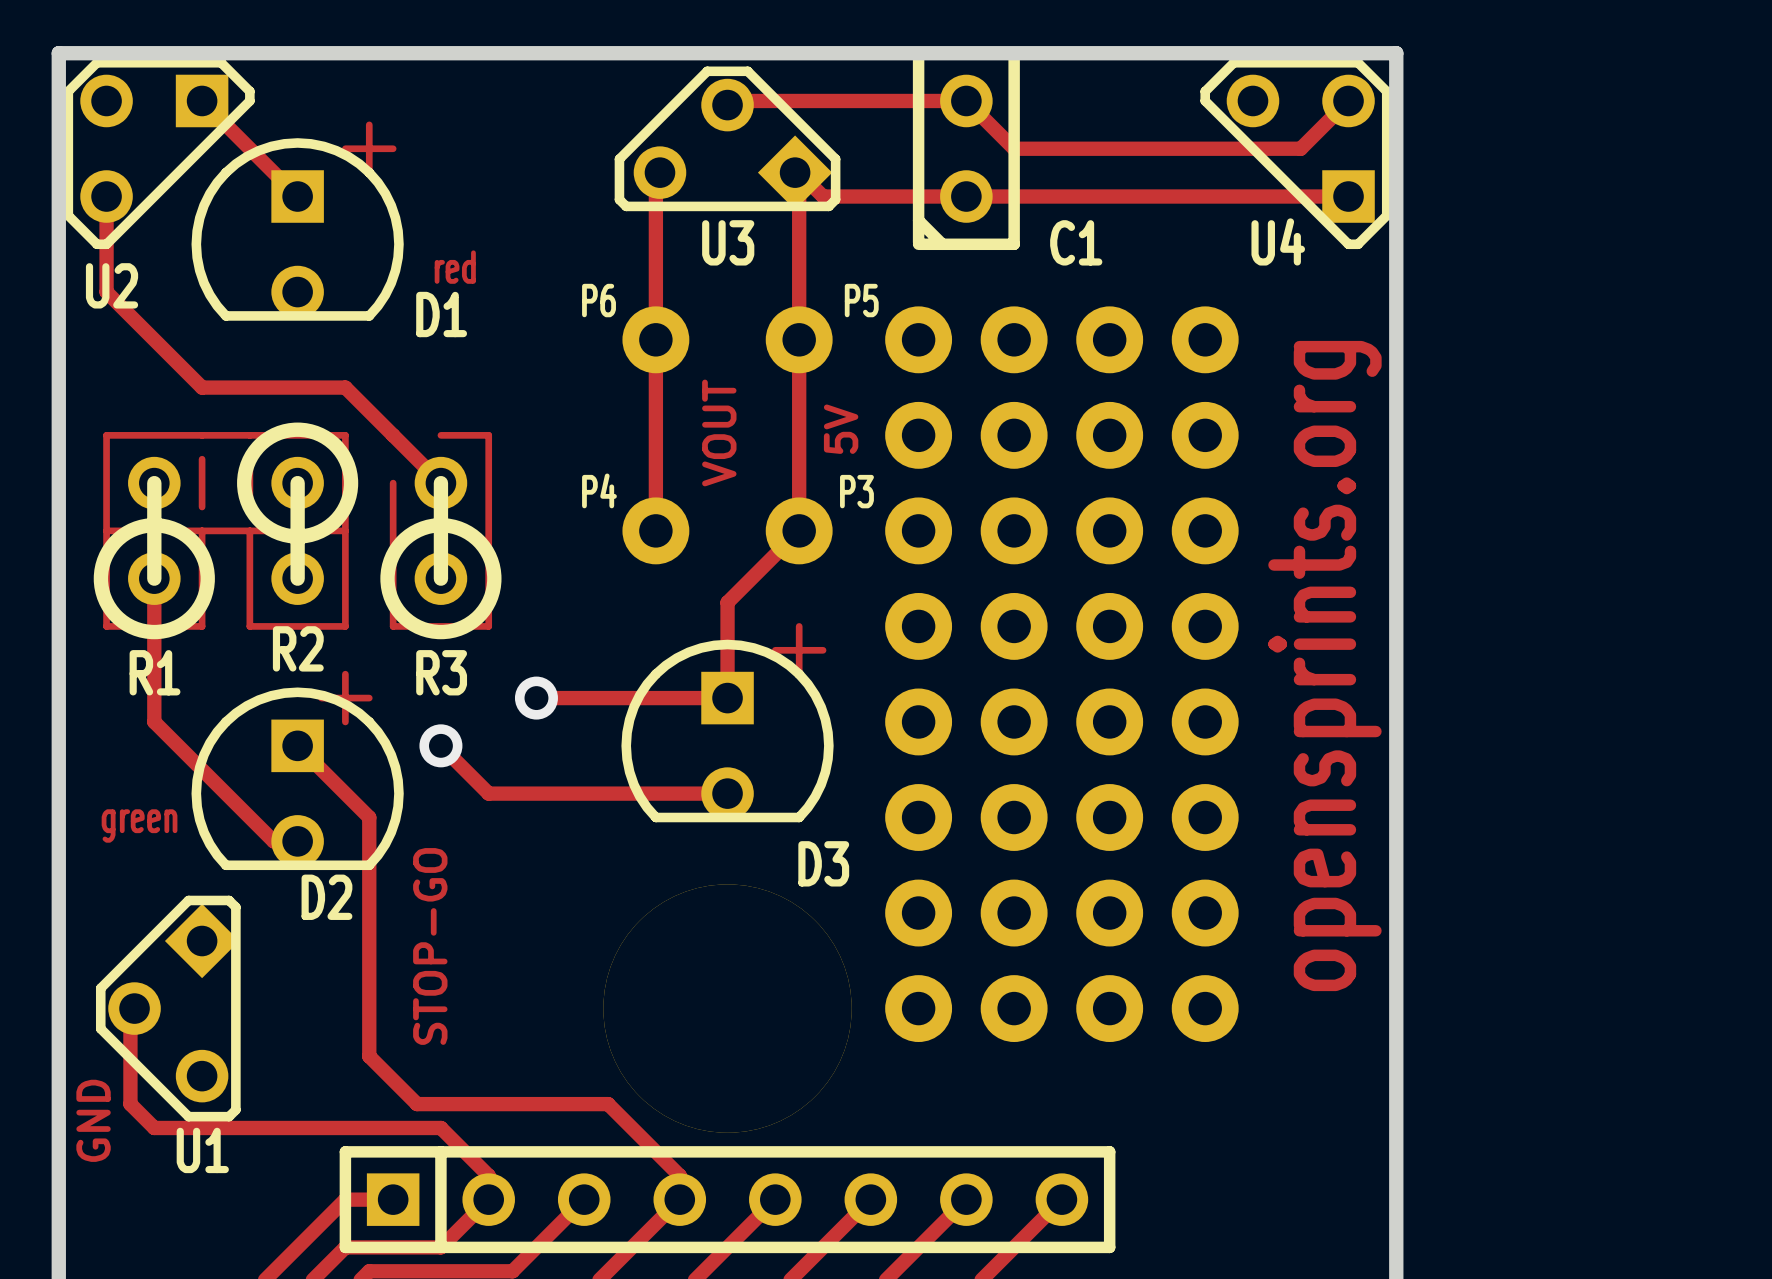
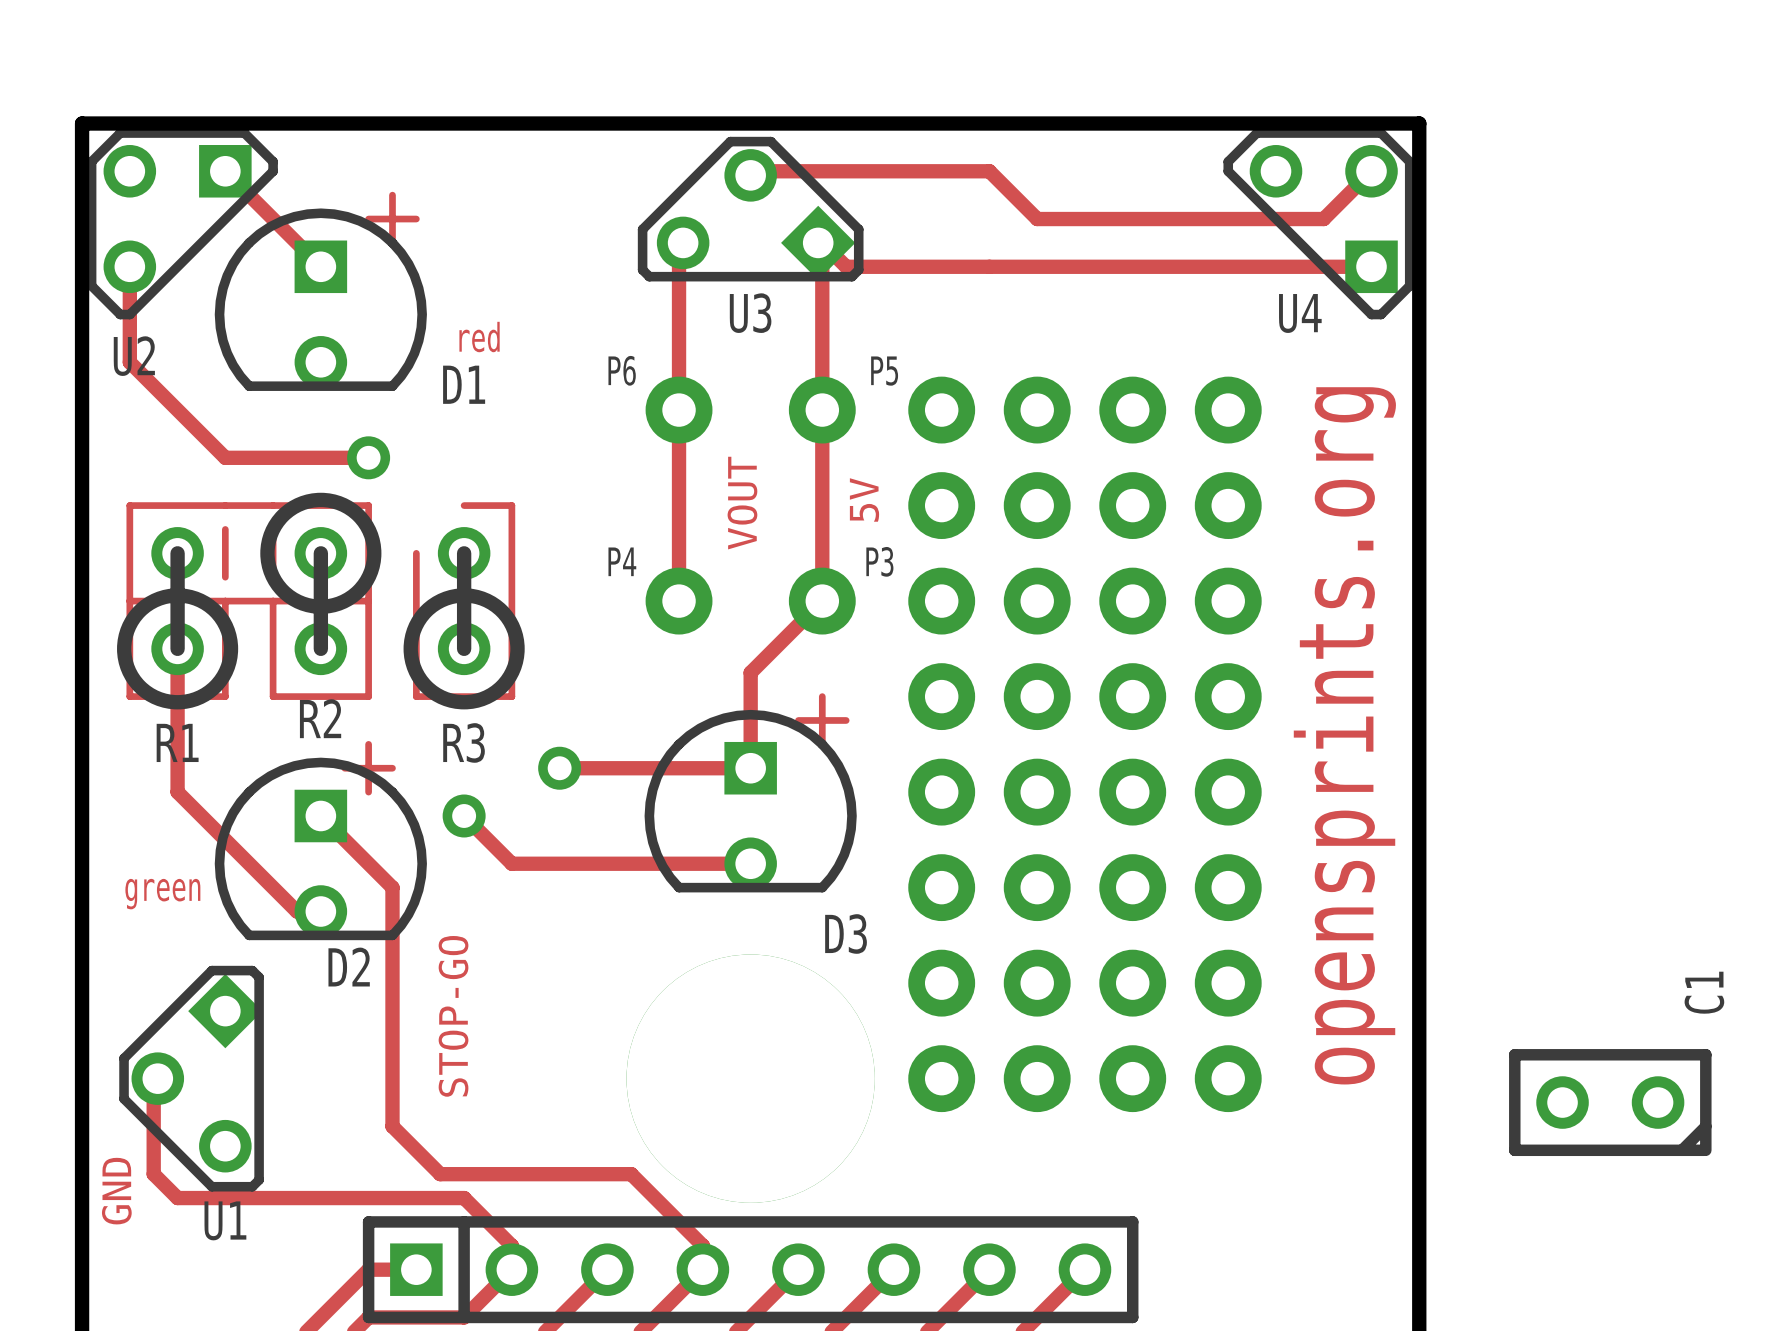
C1 rotation: 0° (966, 148) -> 90° counterclockwise (1610, 1102)
C1 position: (966, 148) -> (1610, 1102)
track: (345, 387) (440, 483) -> none
via: none -> (368, 457)

